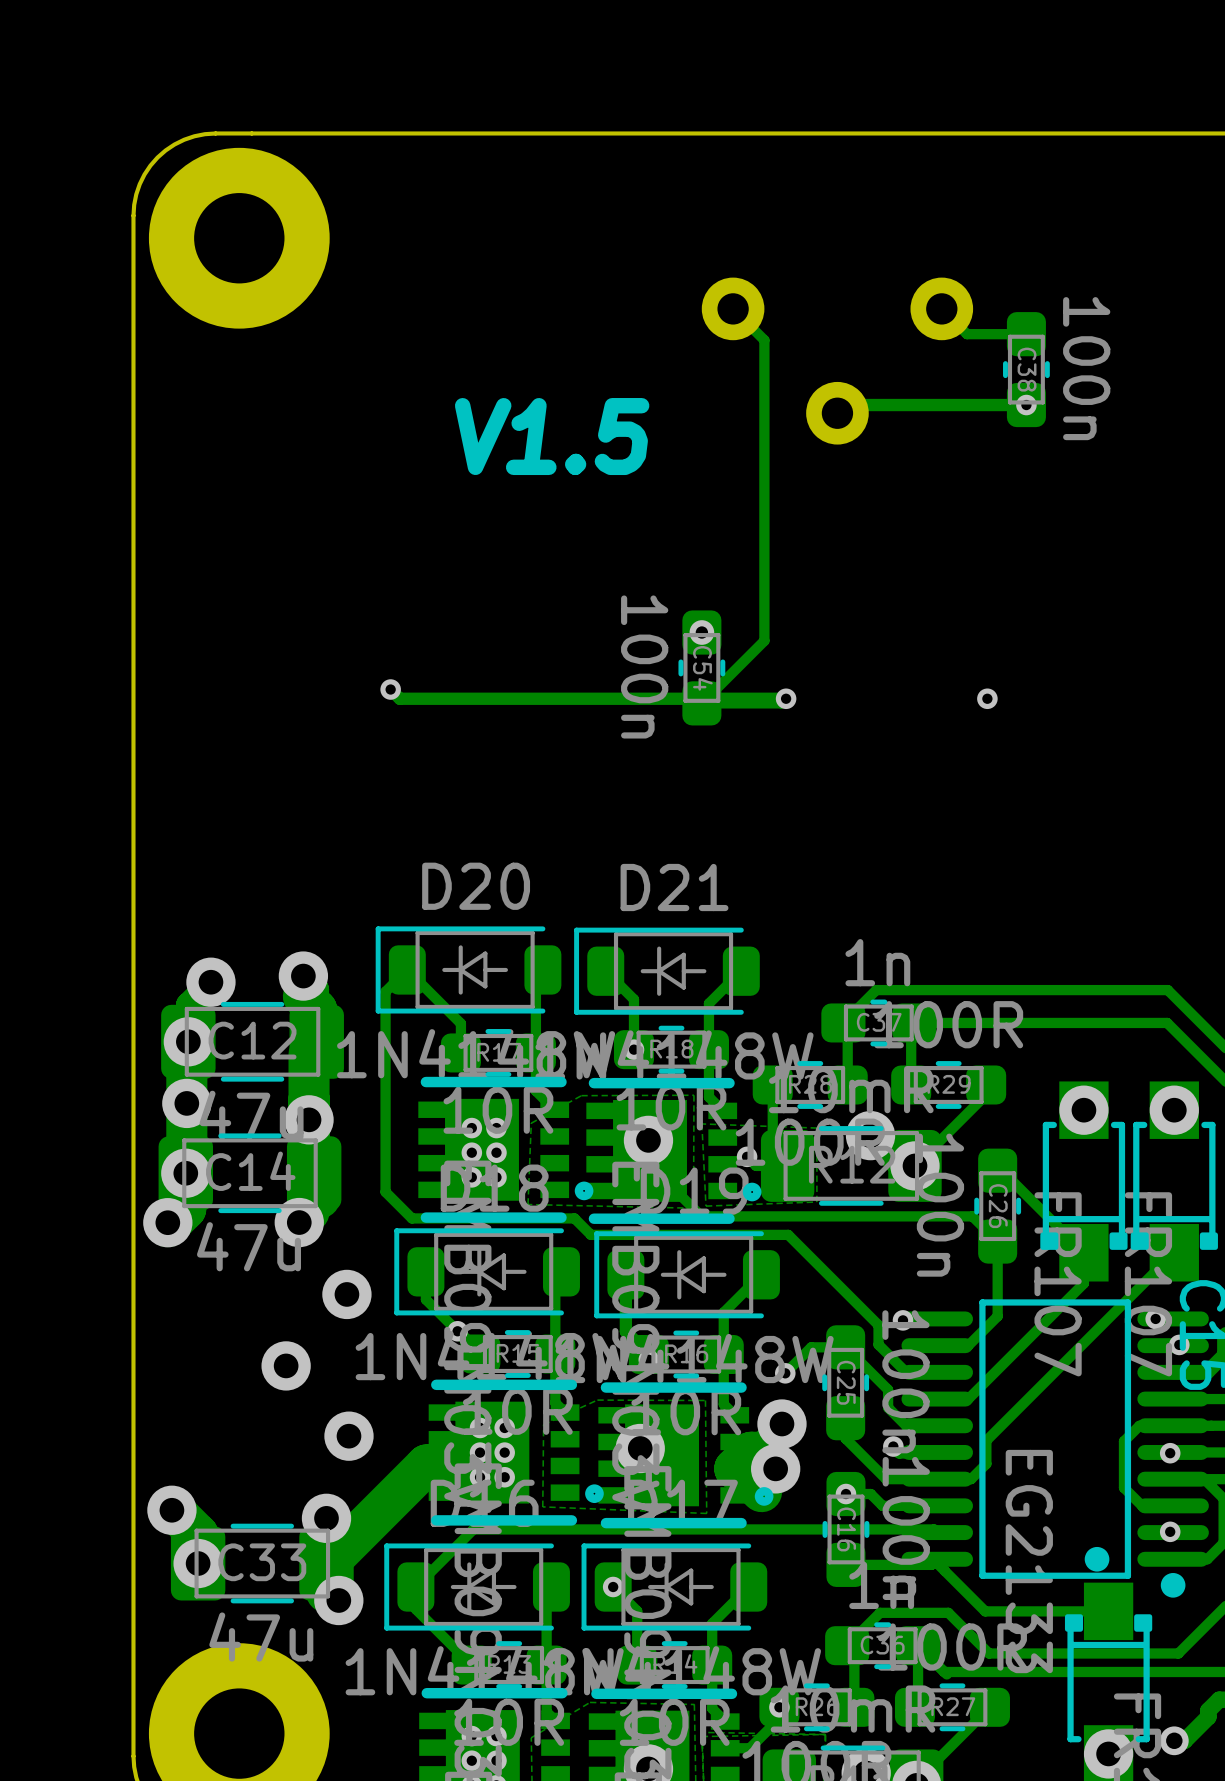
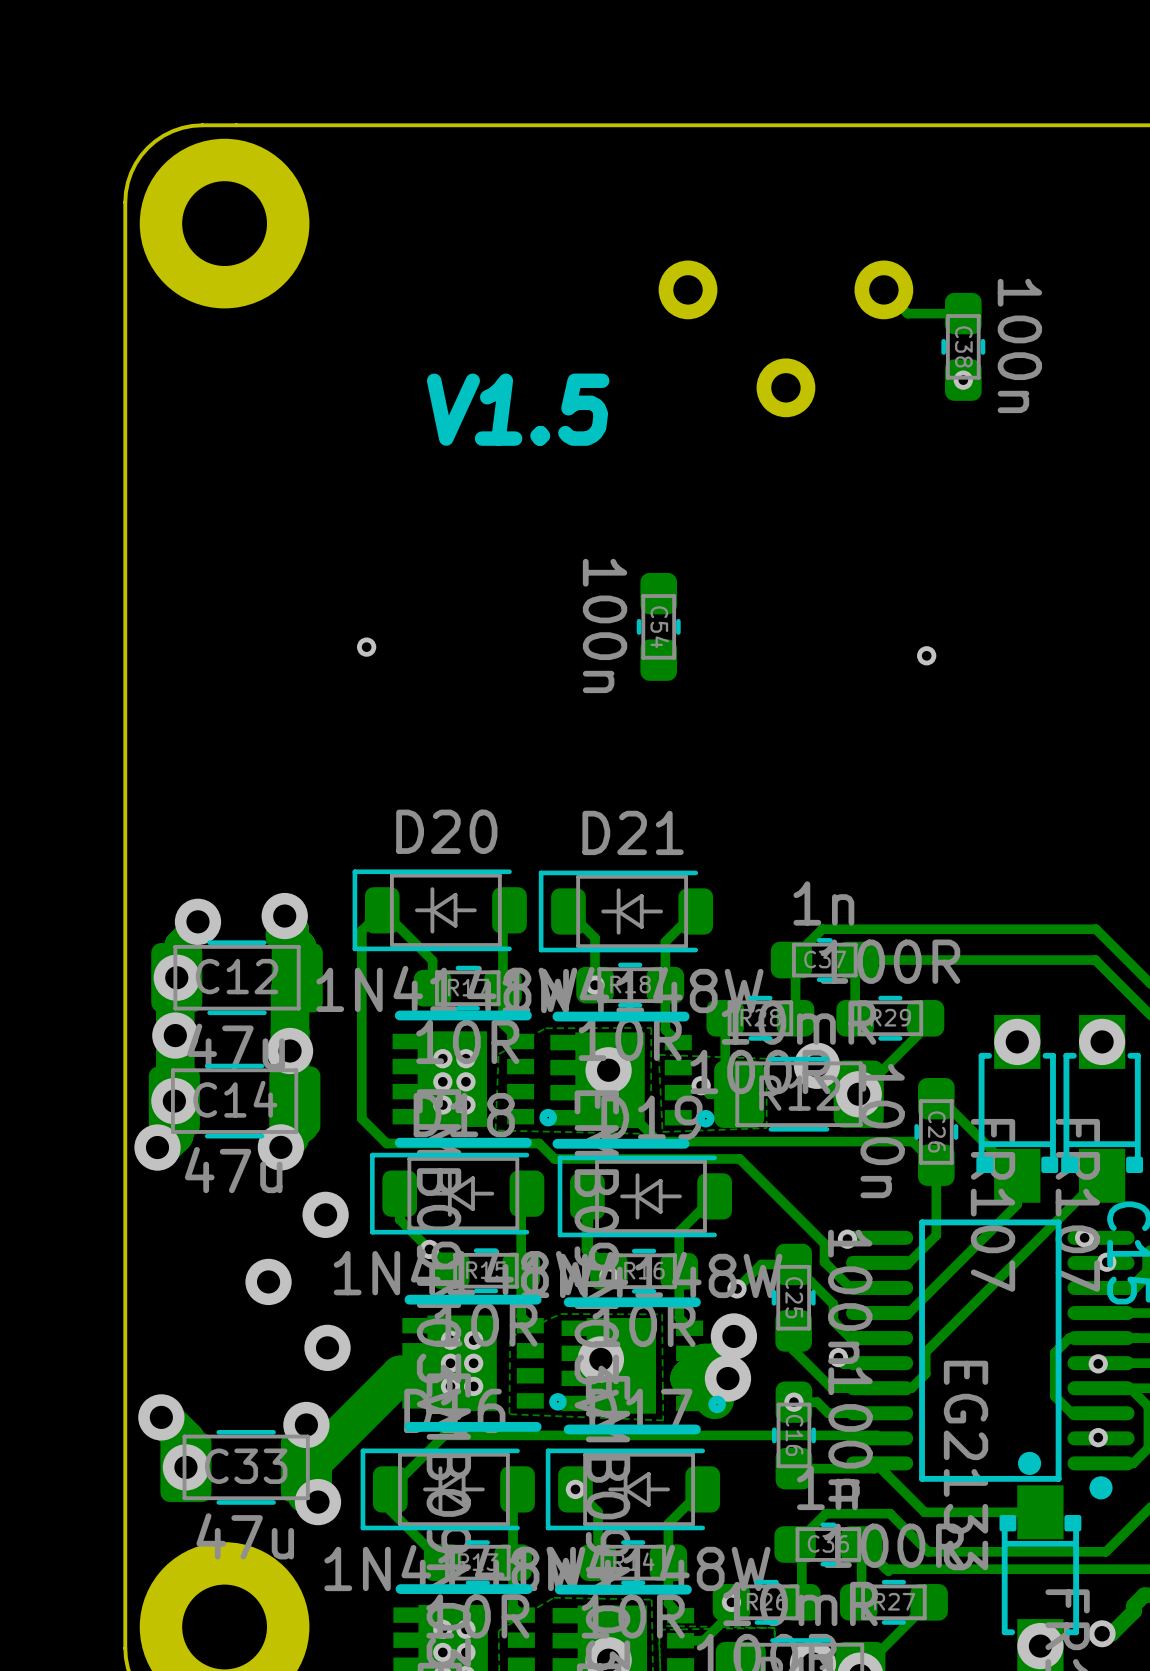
track: (733, 308) (764, 340) (764, 640) (701, 703) (781, 703) (786, 698) (399, 698) (390, 689) -> none
track: (1026, 405) (845, 405) (837, 413) -> none
via: (701, 632) -> none
via: (786, 698) -> none

